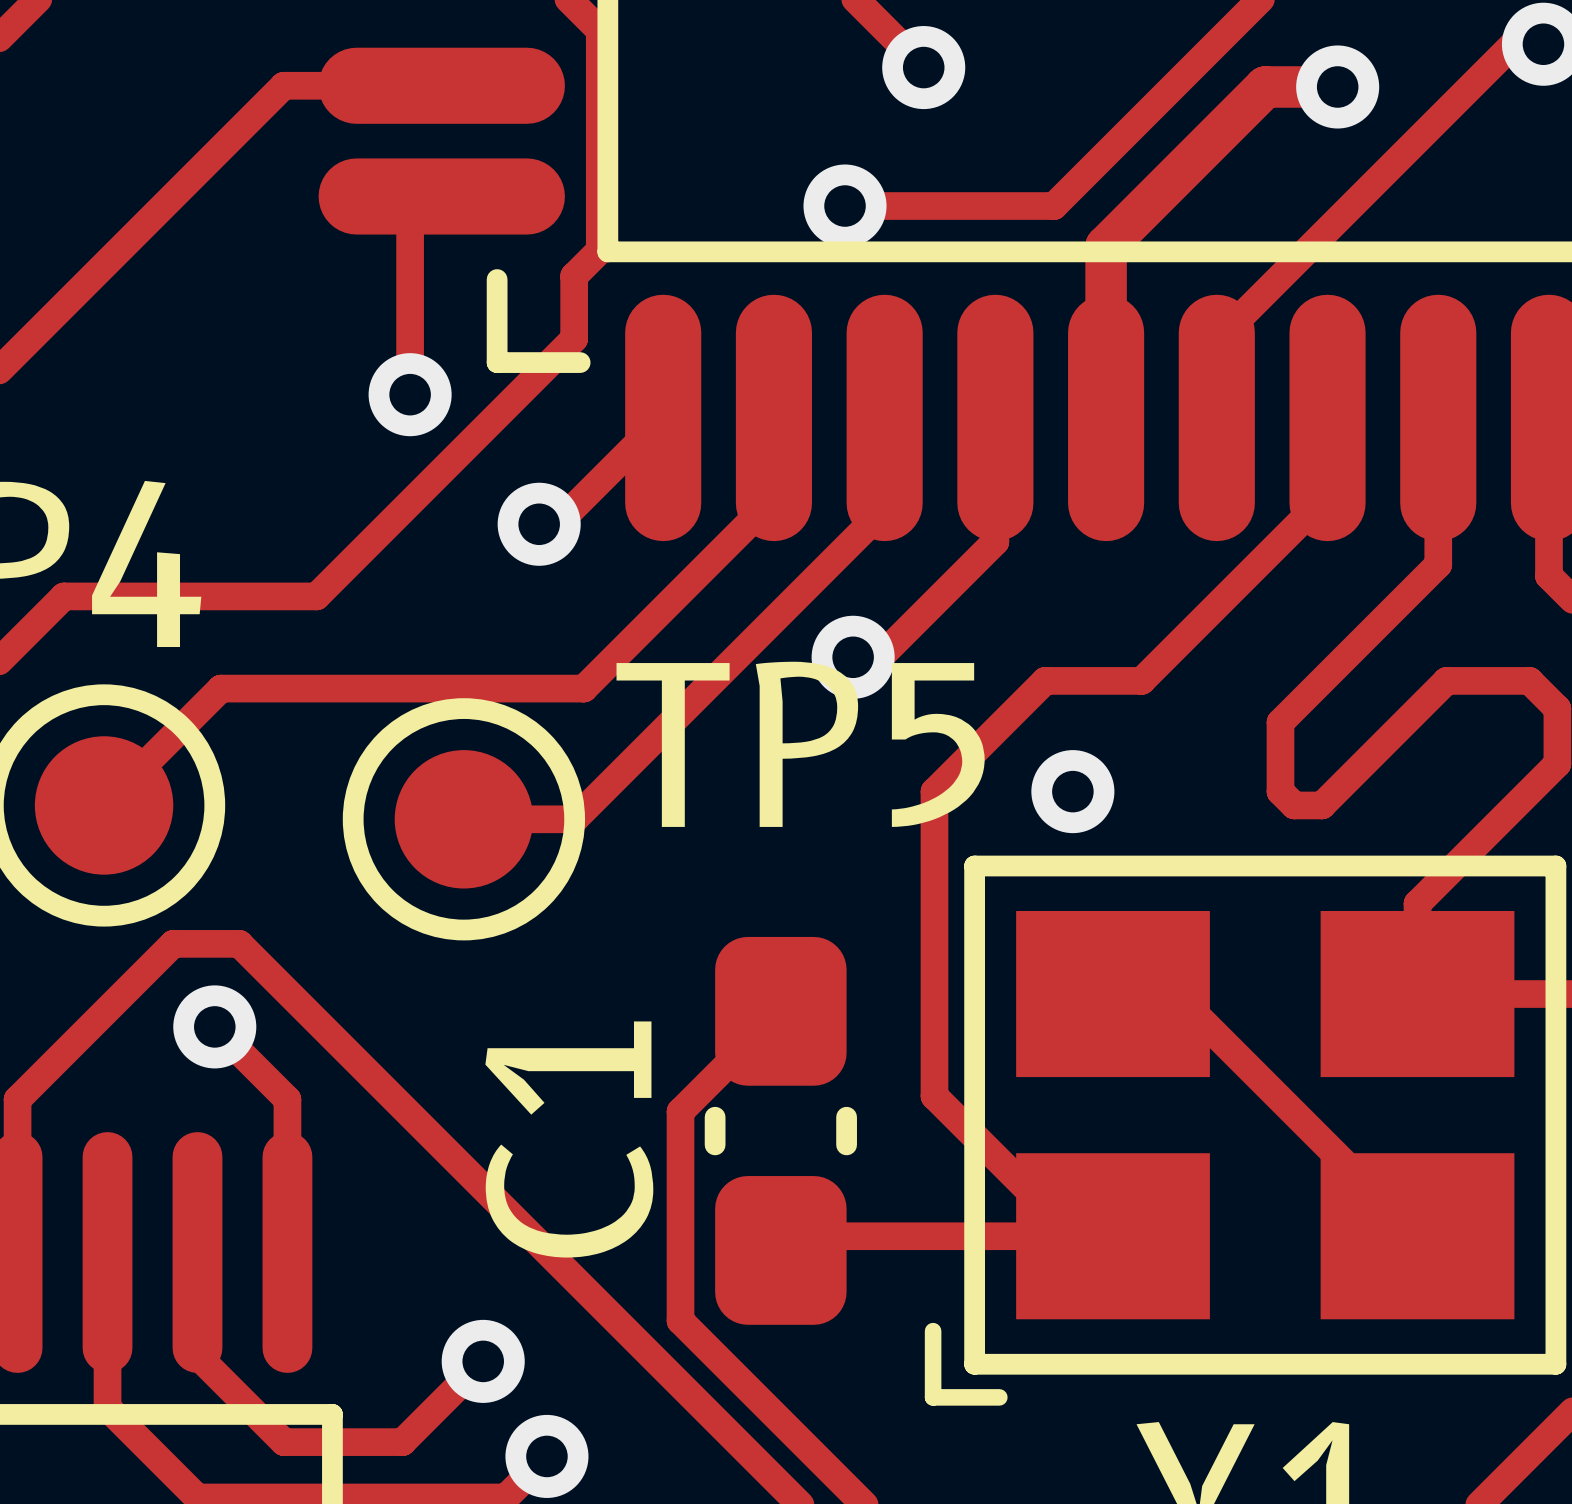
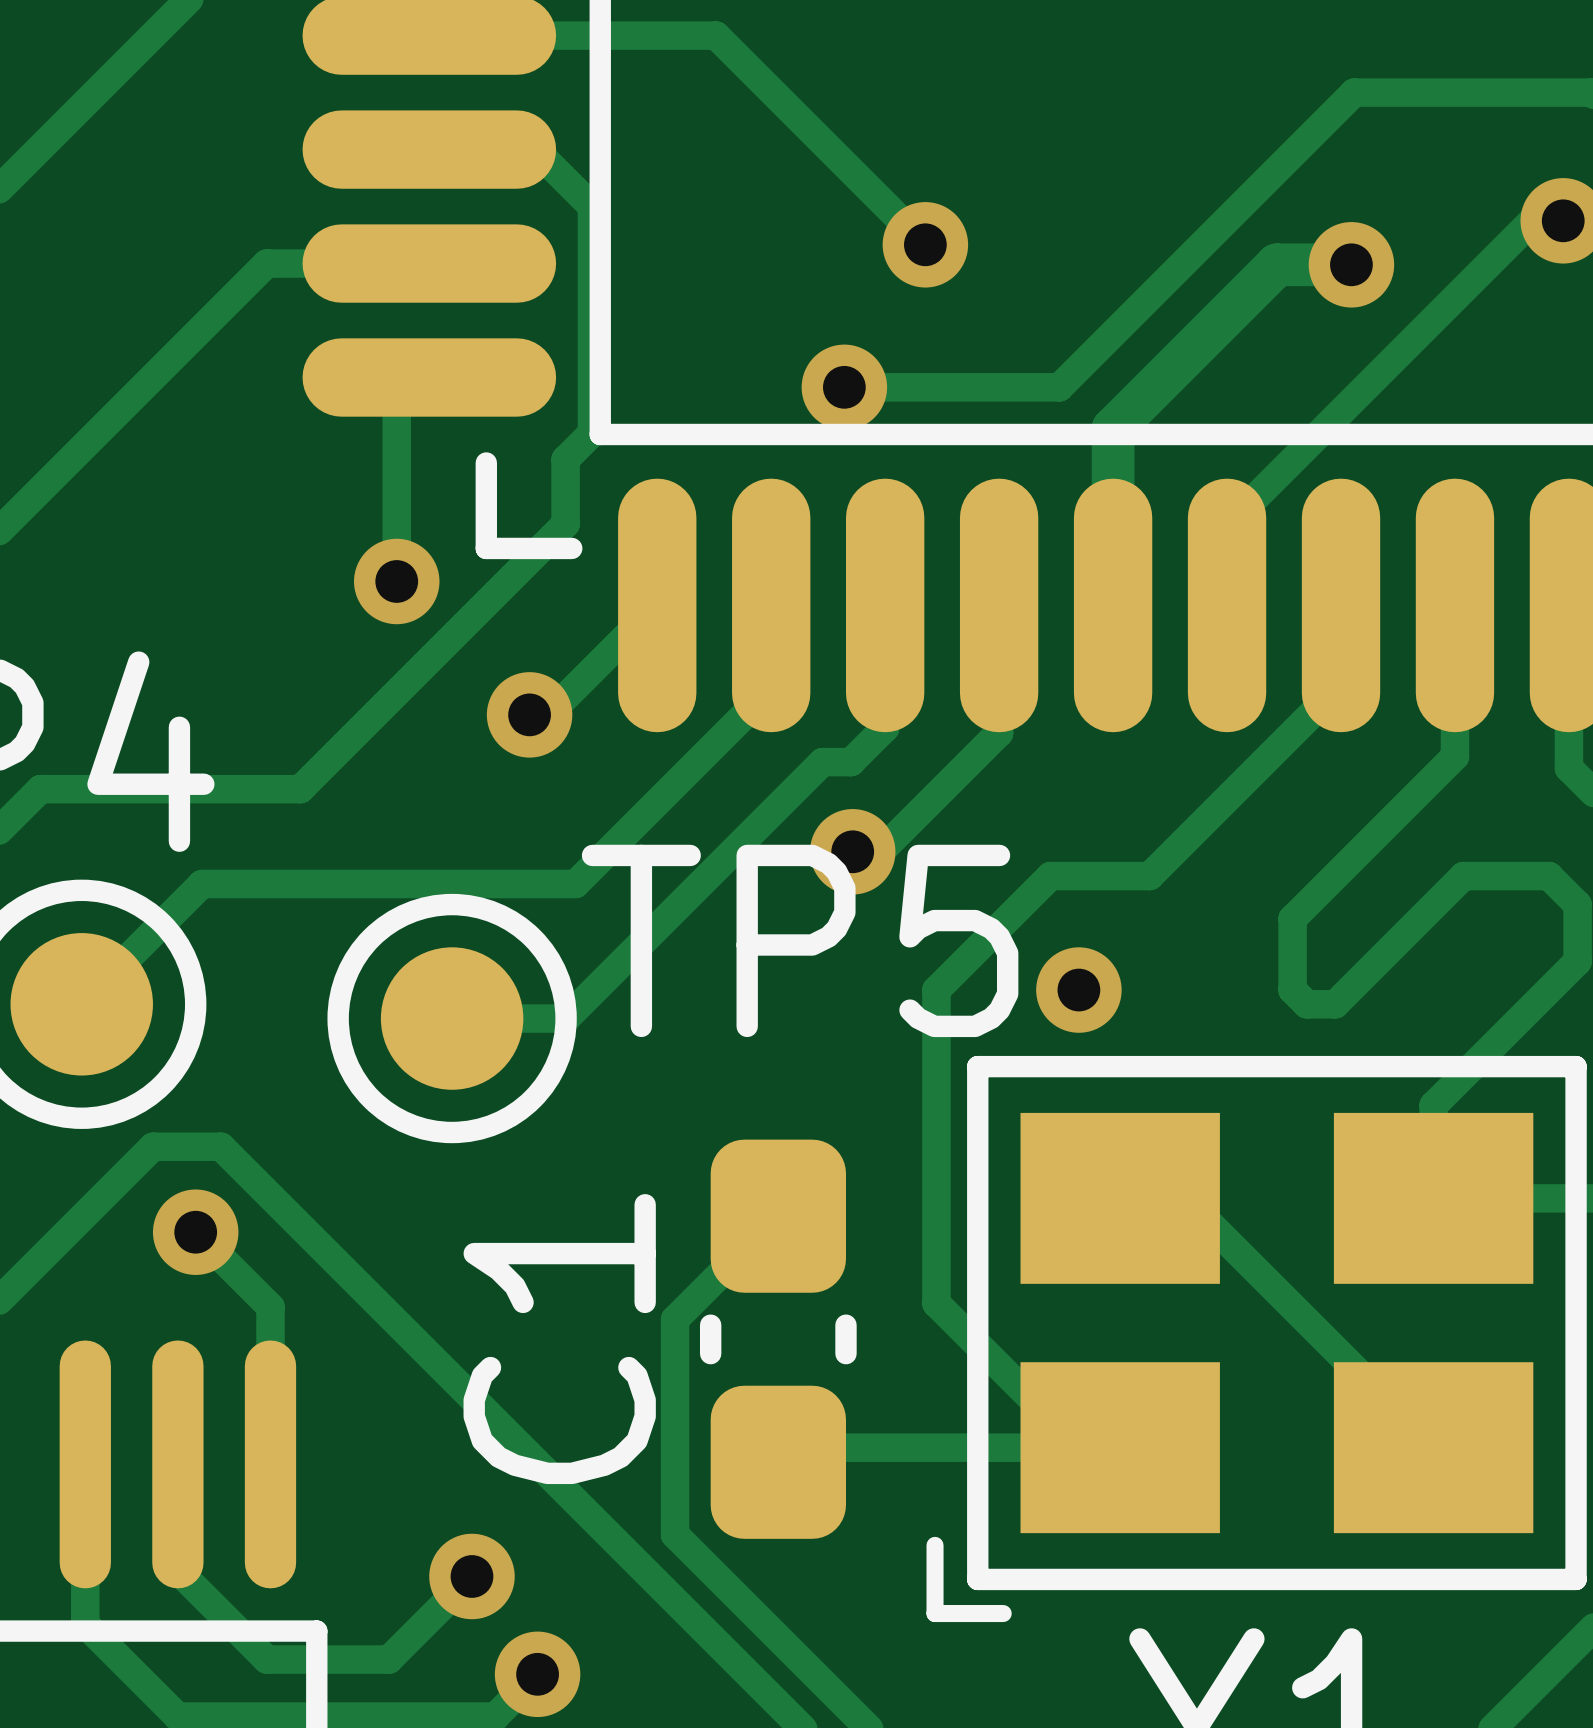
track: (884, 509) (823, 570) -> (885, 699) (885, 727) (850, 762) (822, 762)

